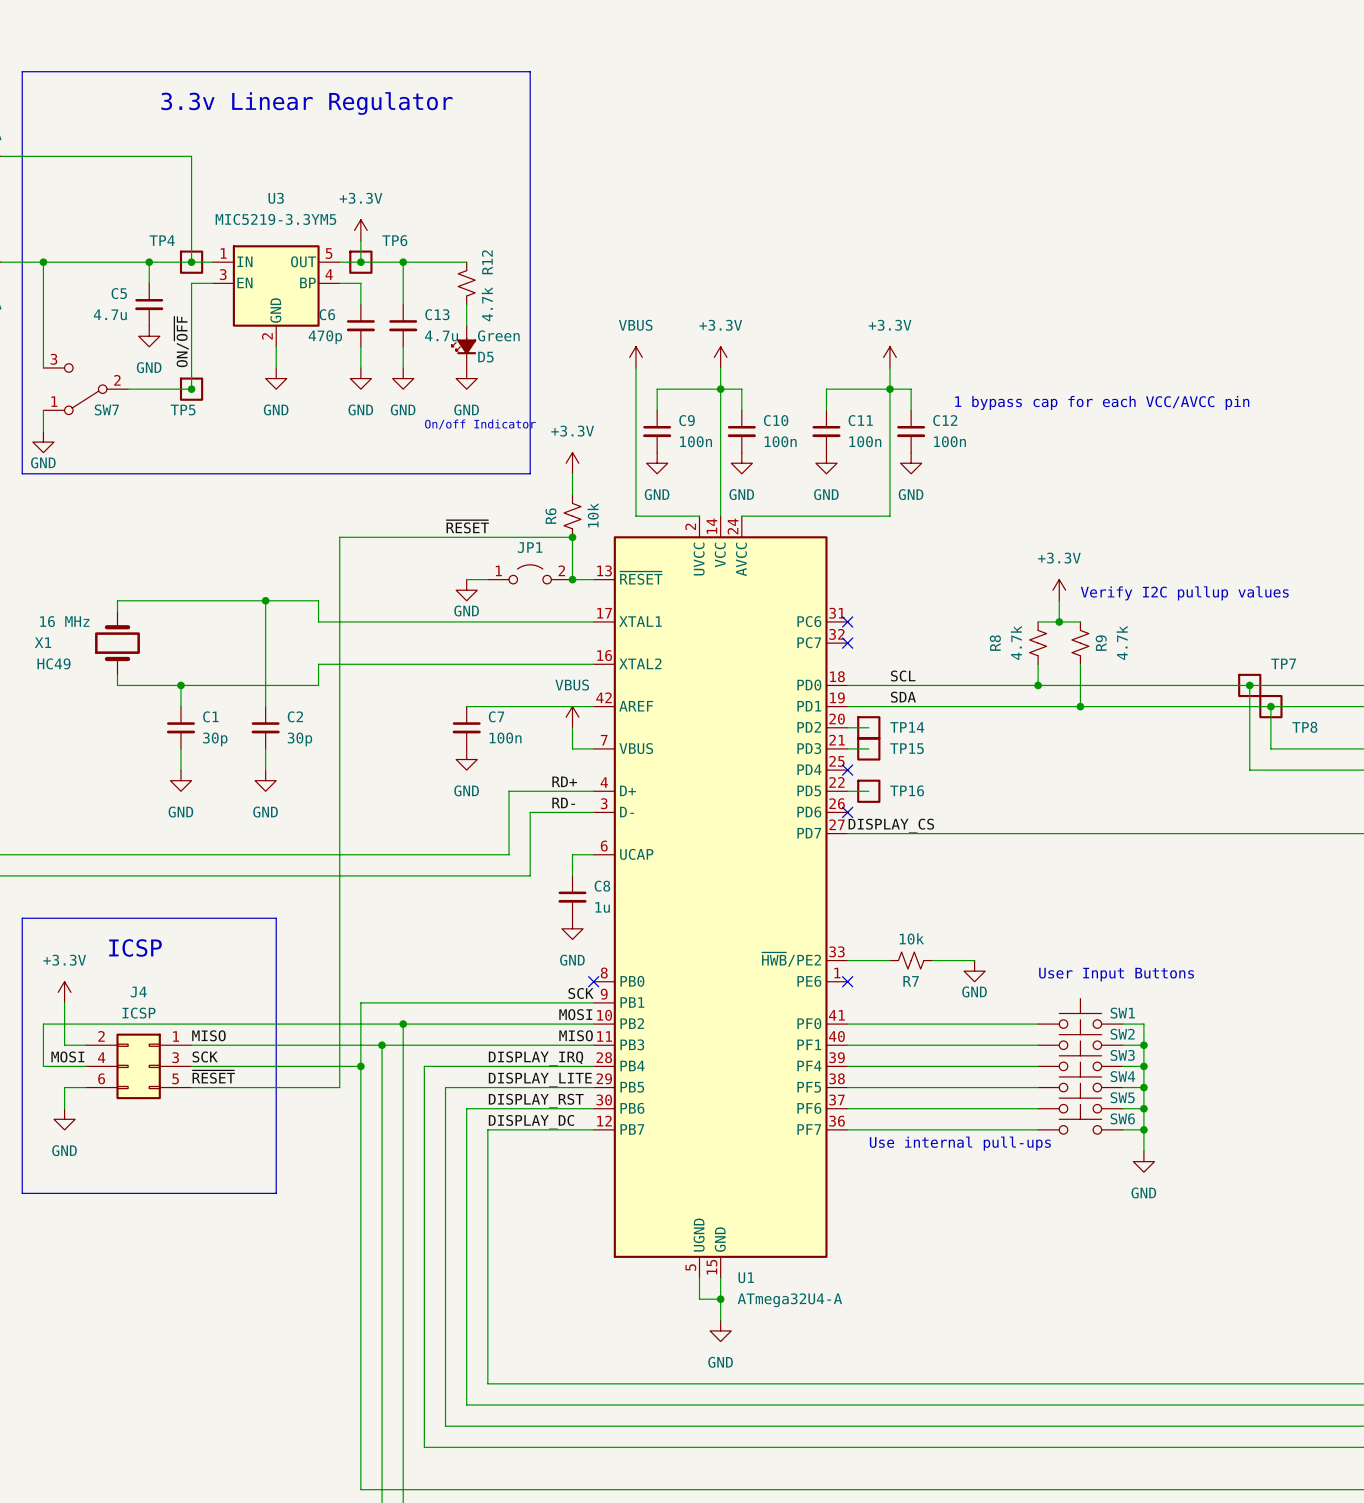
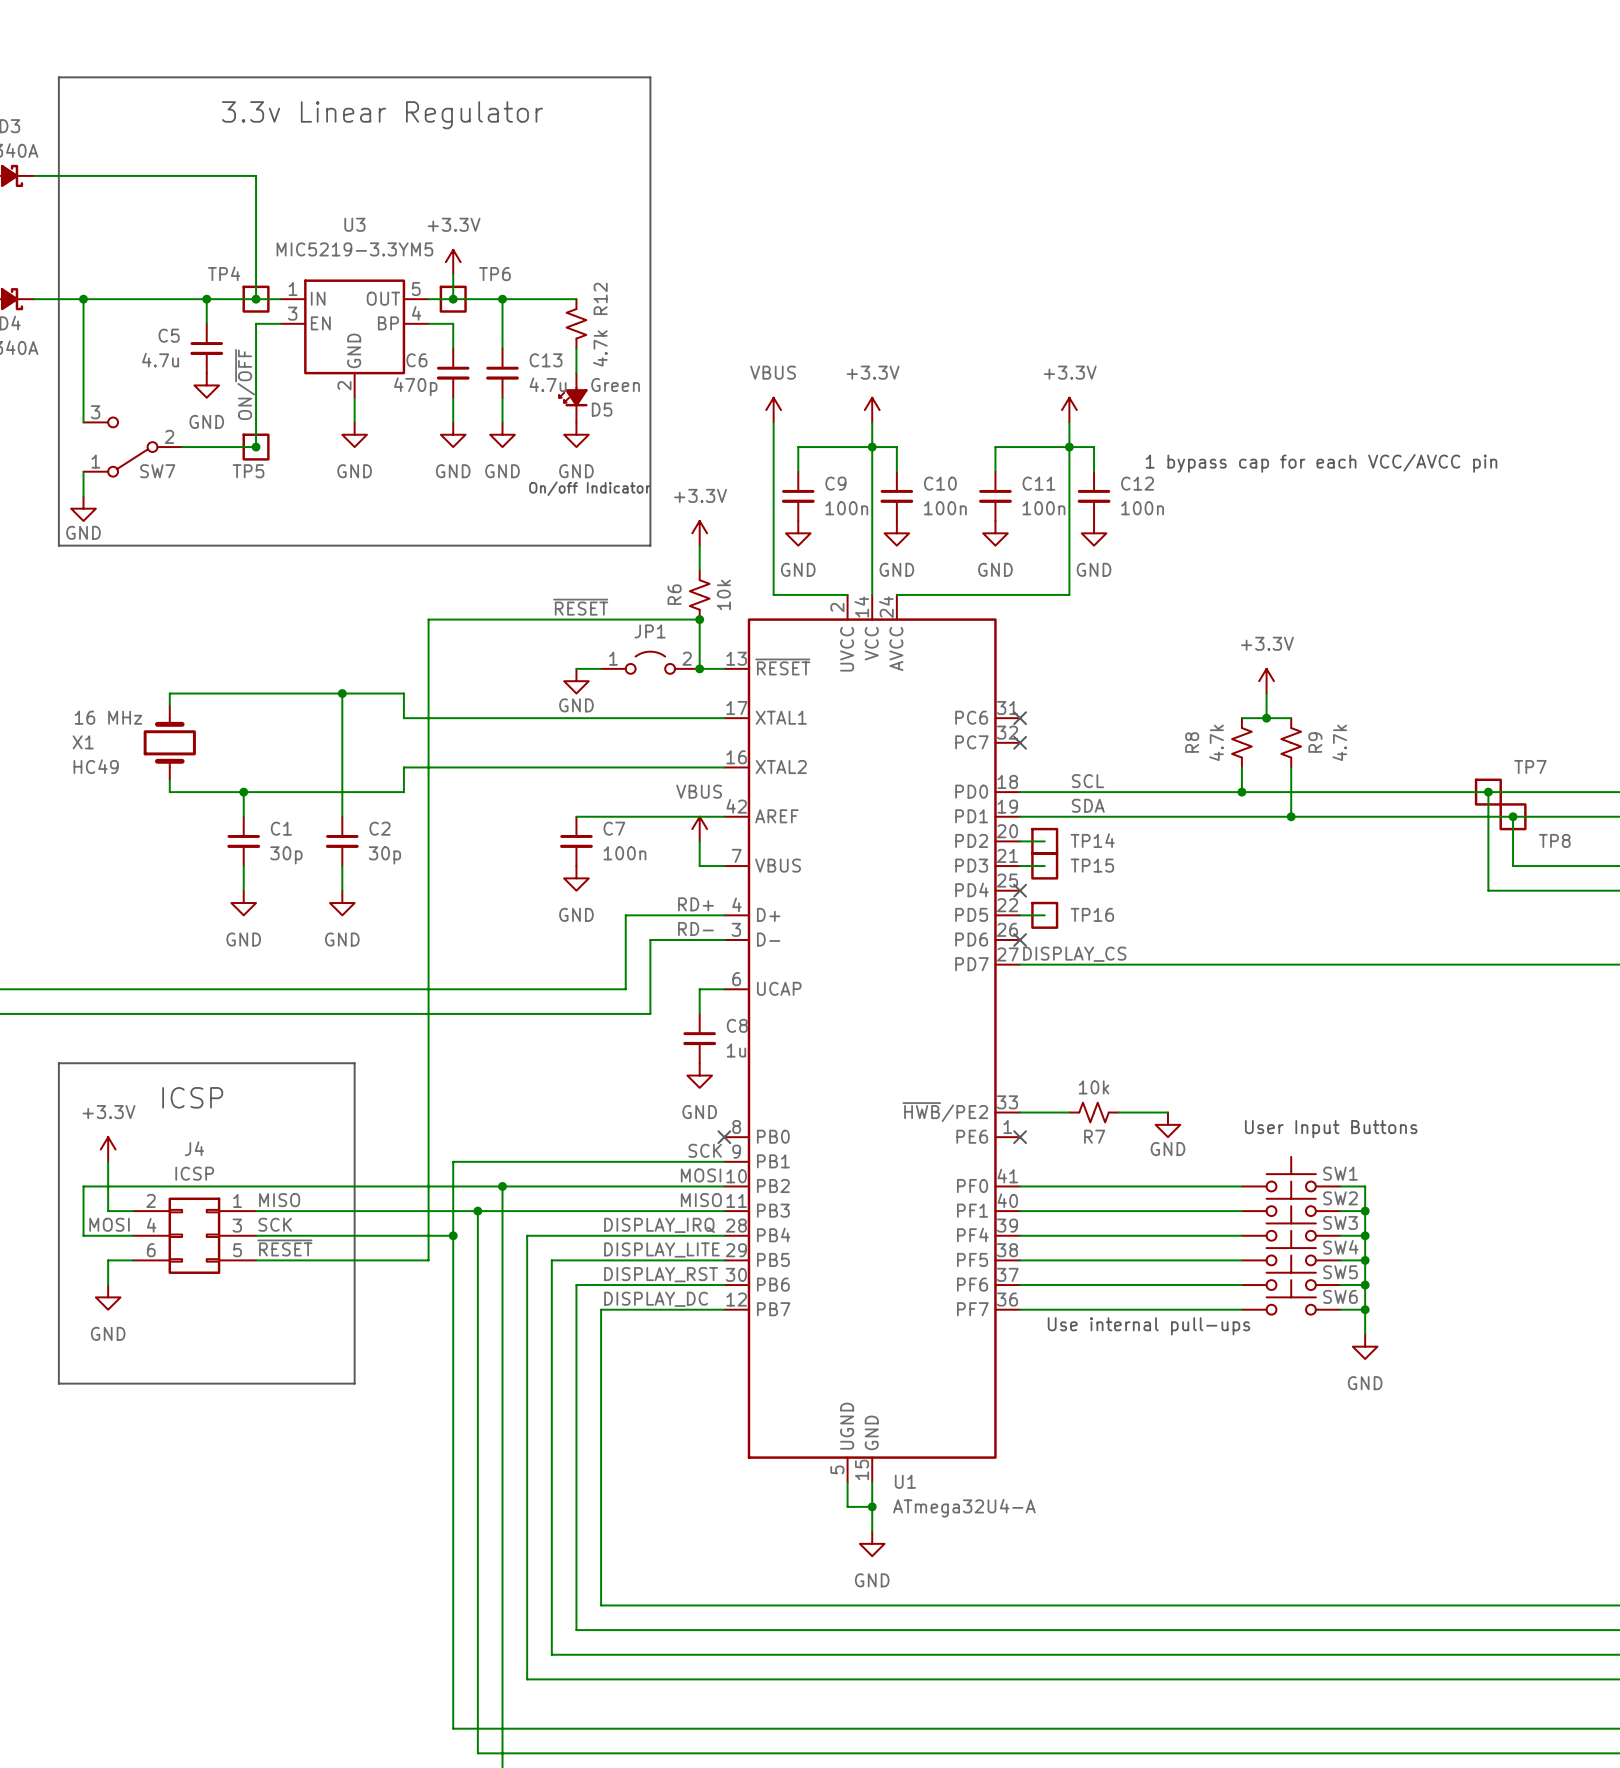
text: Verify I2C pullup values (1184, 593) -> none

